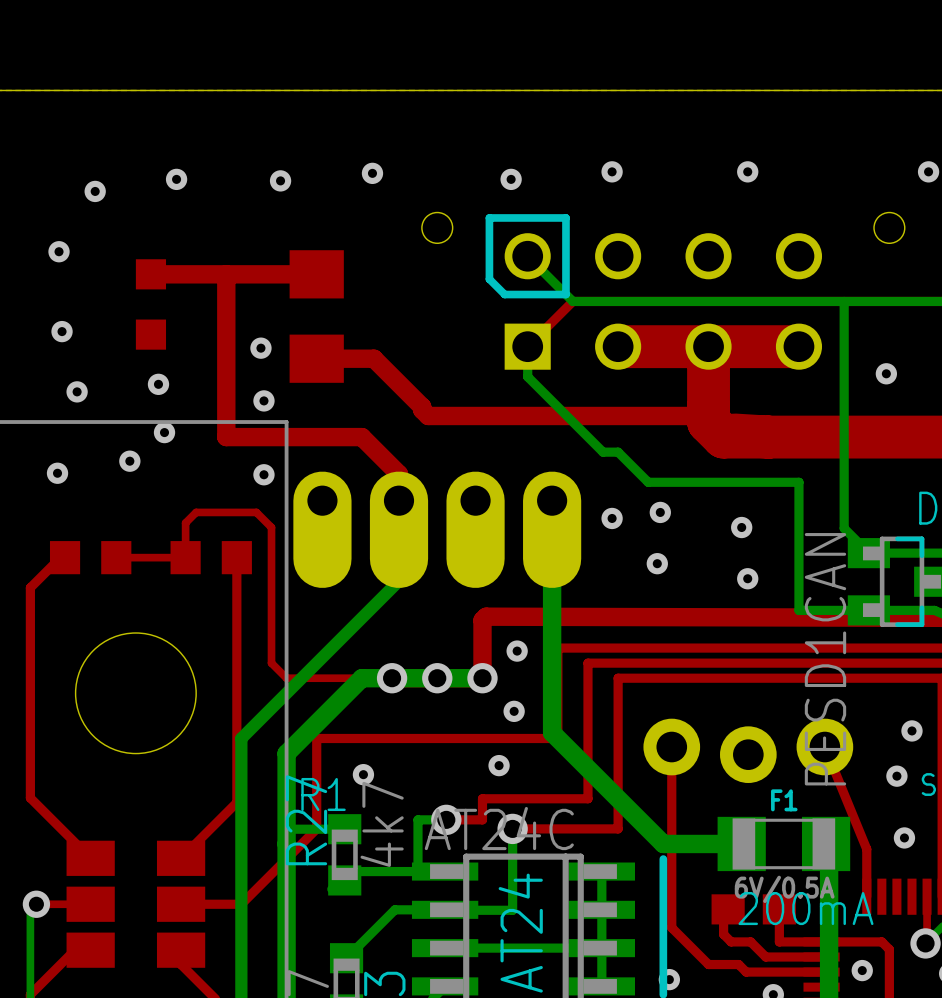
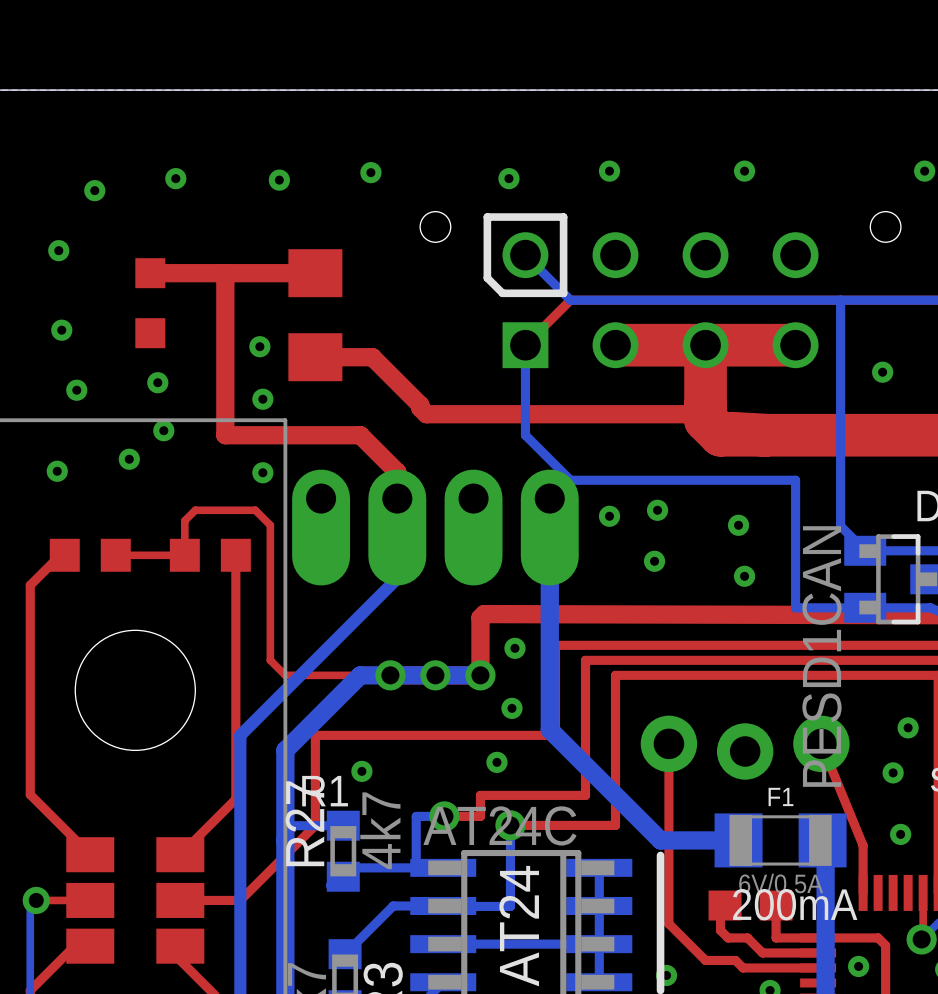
bottom track: (527, 376) (603, 452) (618, 452) (648, 482) -> (525, 375) (525, 435) (570, 480) (645, 480)

